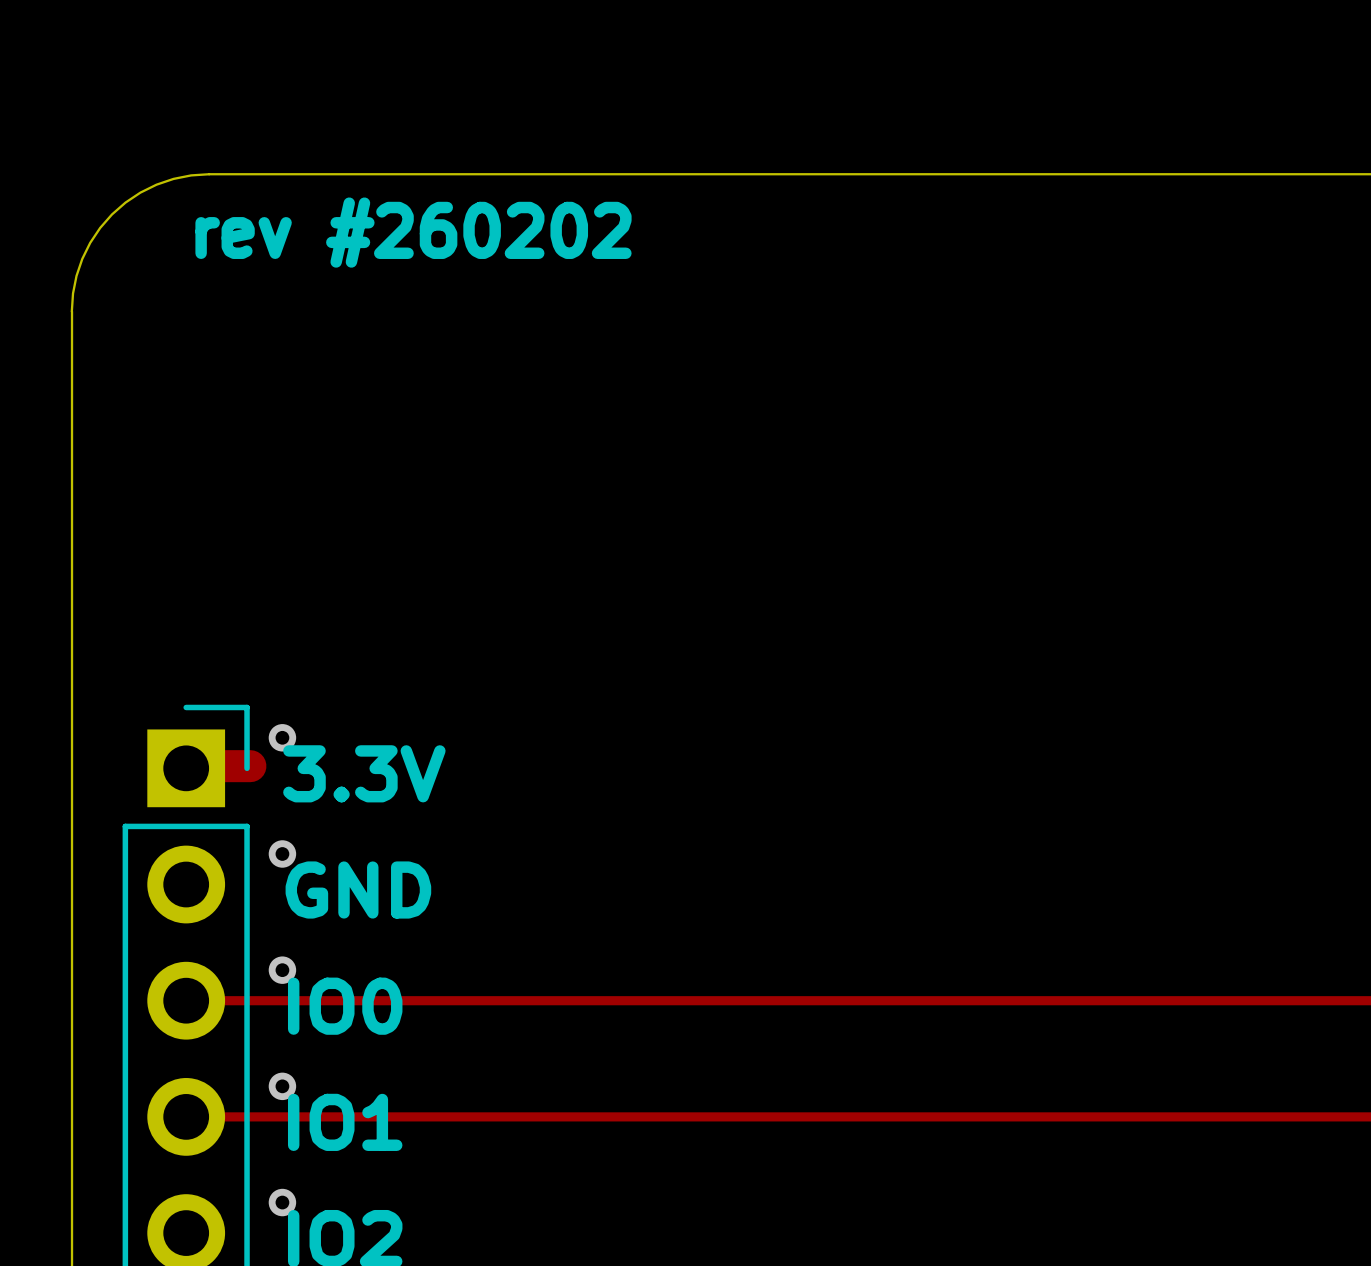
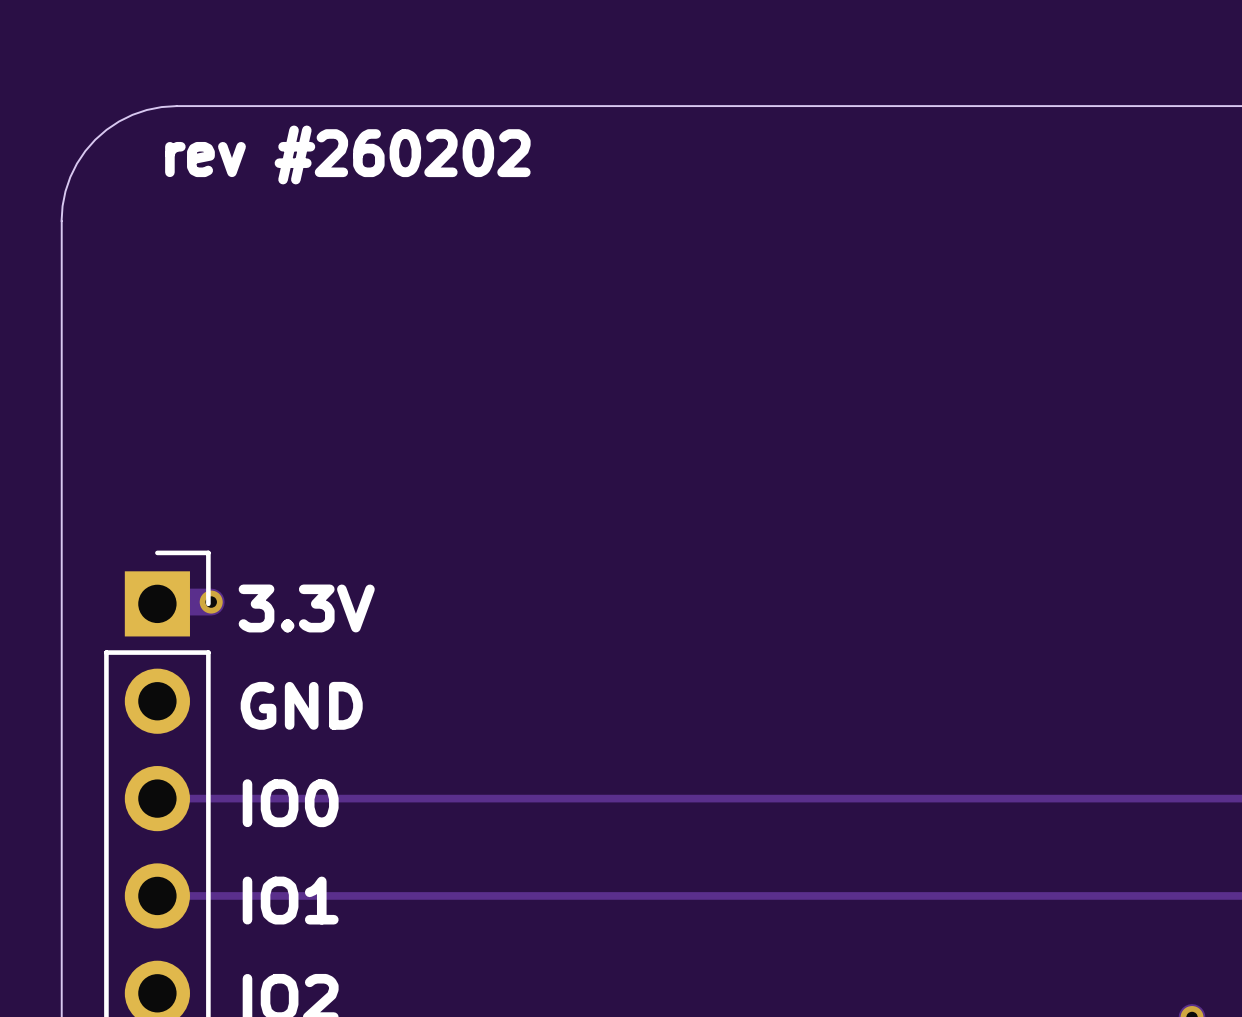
via position: (282, 737) -> (211, 602)
via: (282, 853) -> none
via: (282, 970) -> none
via: (282, 1086) -> none
via: (282, 1202) -> none

